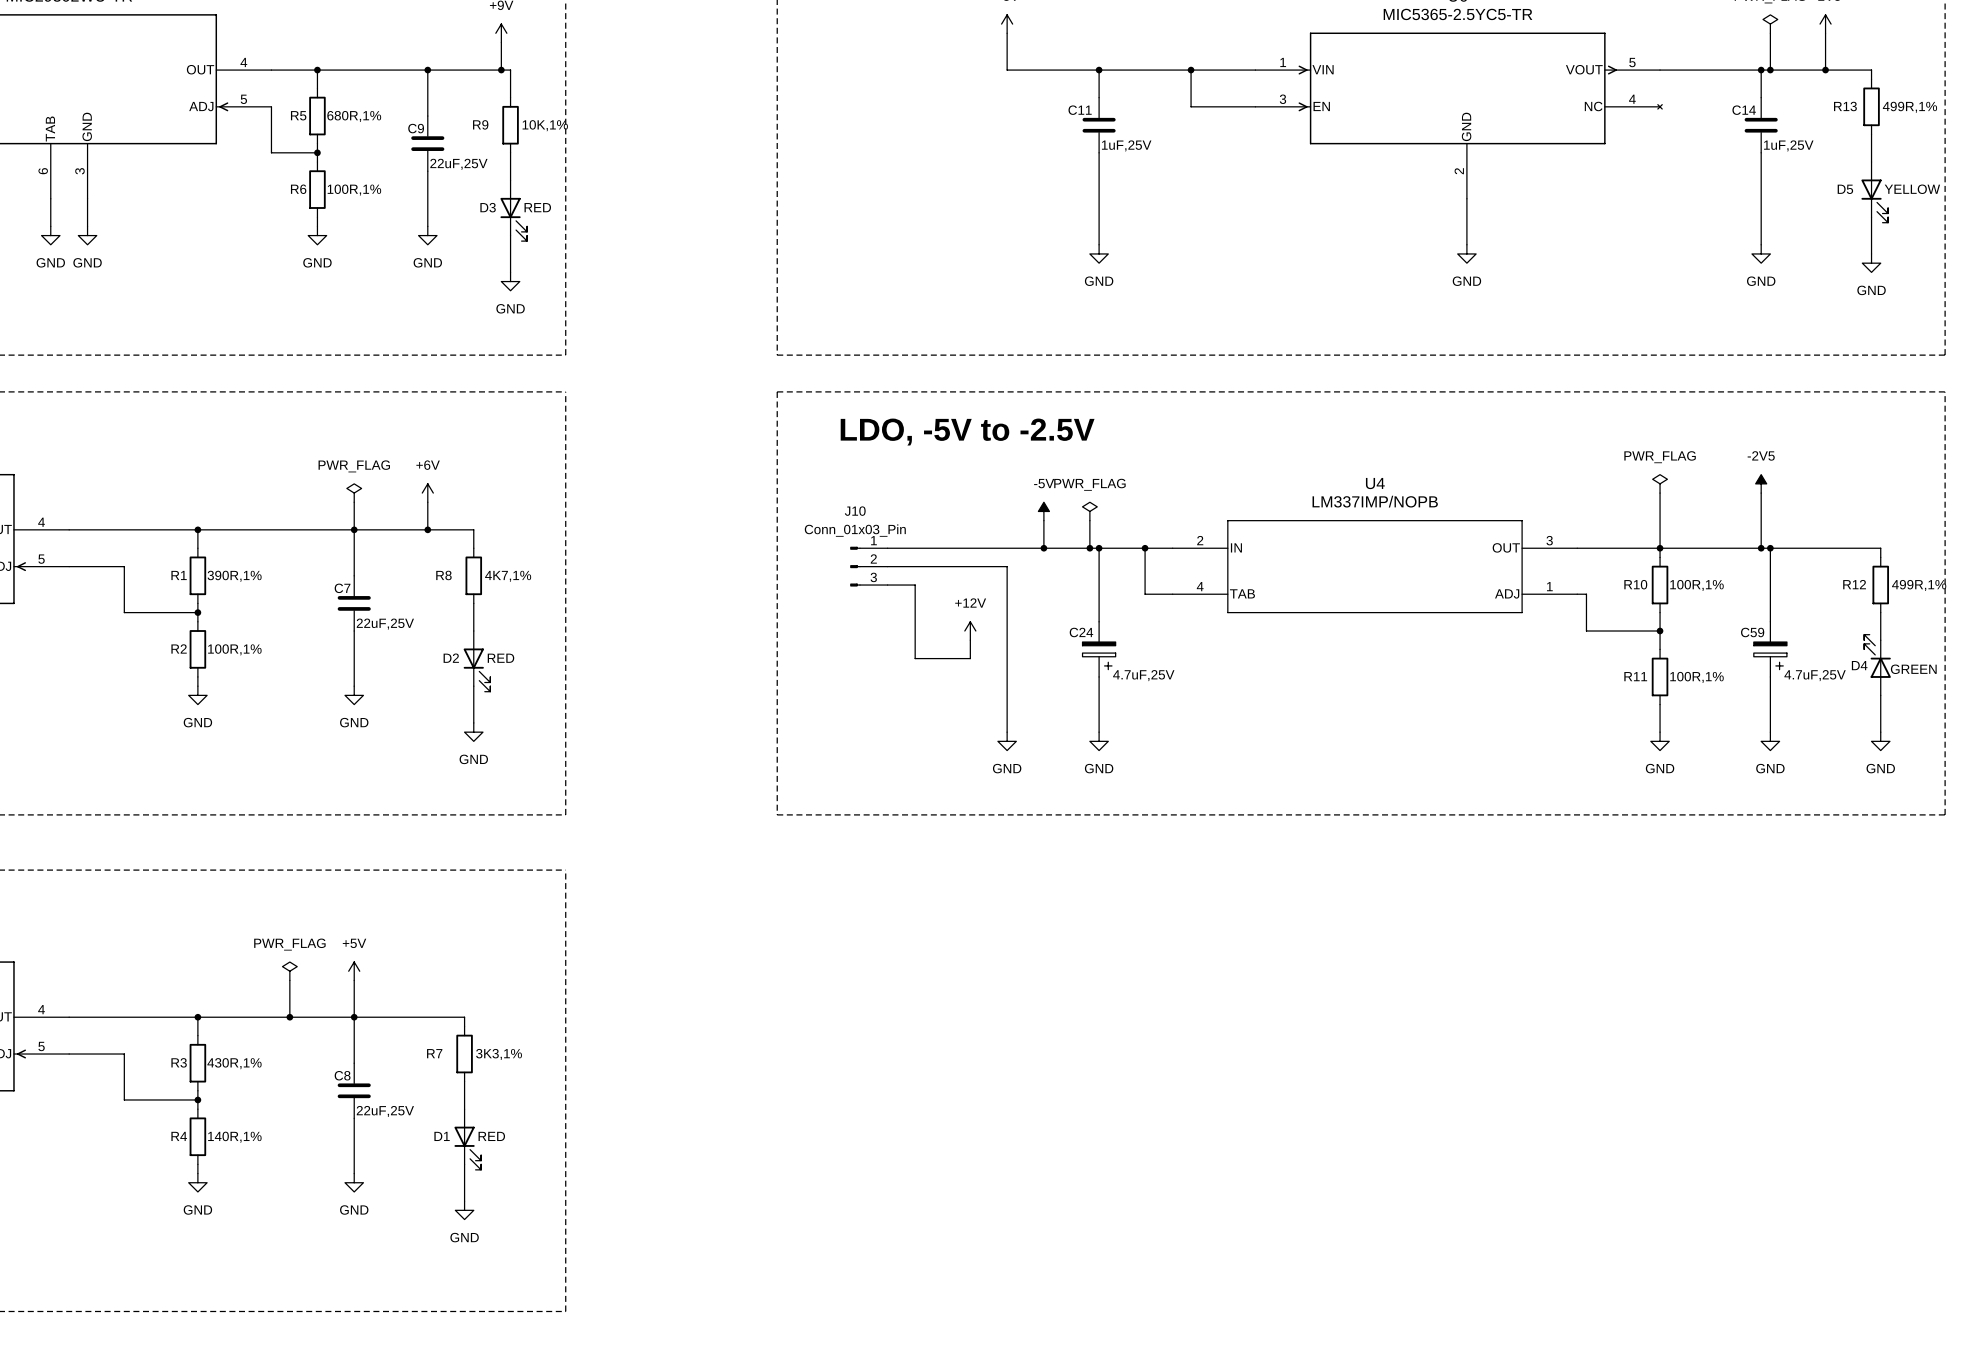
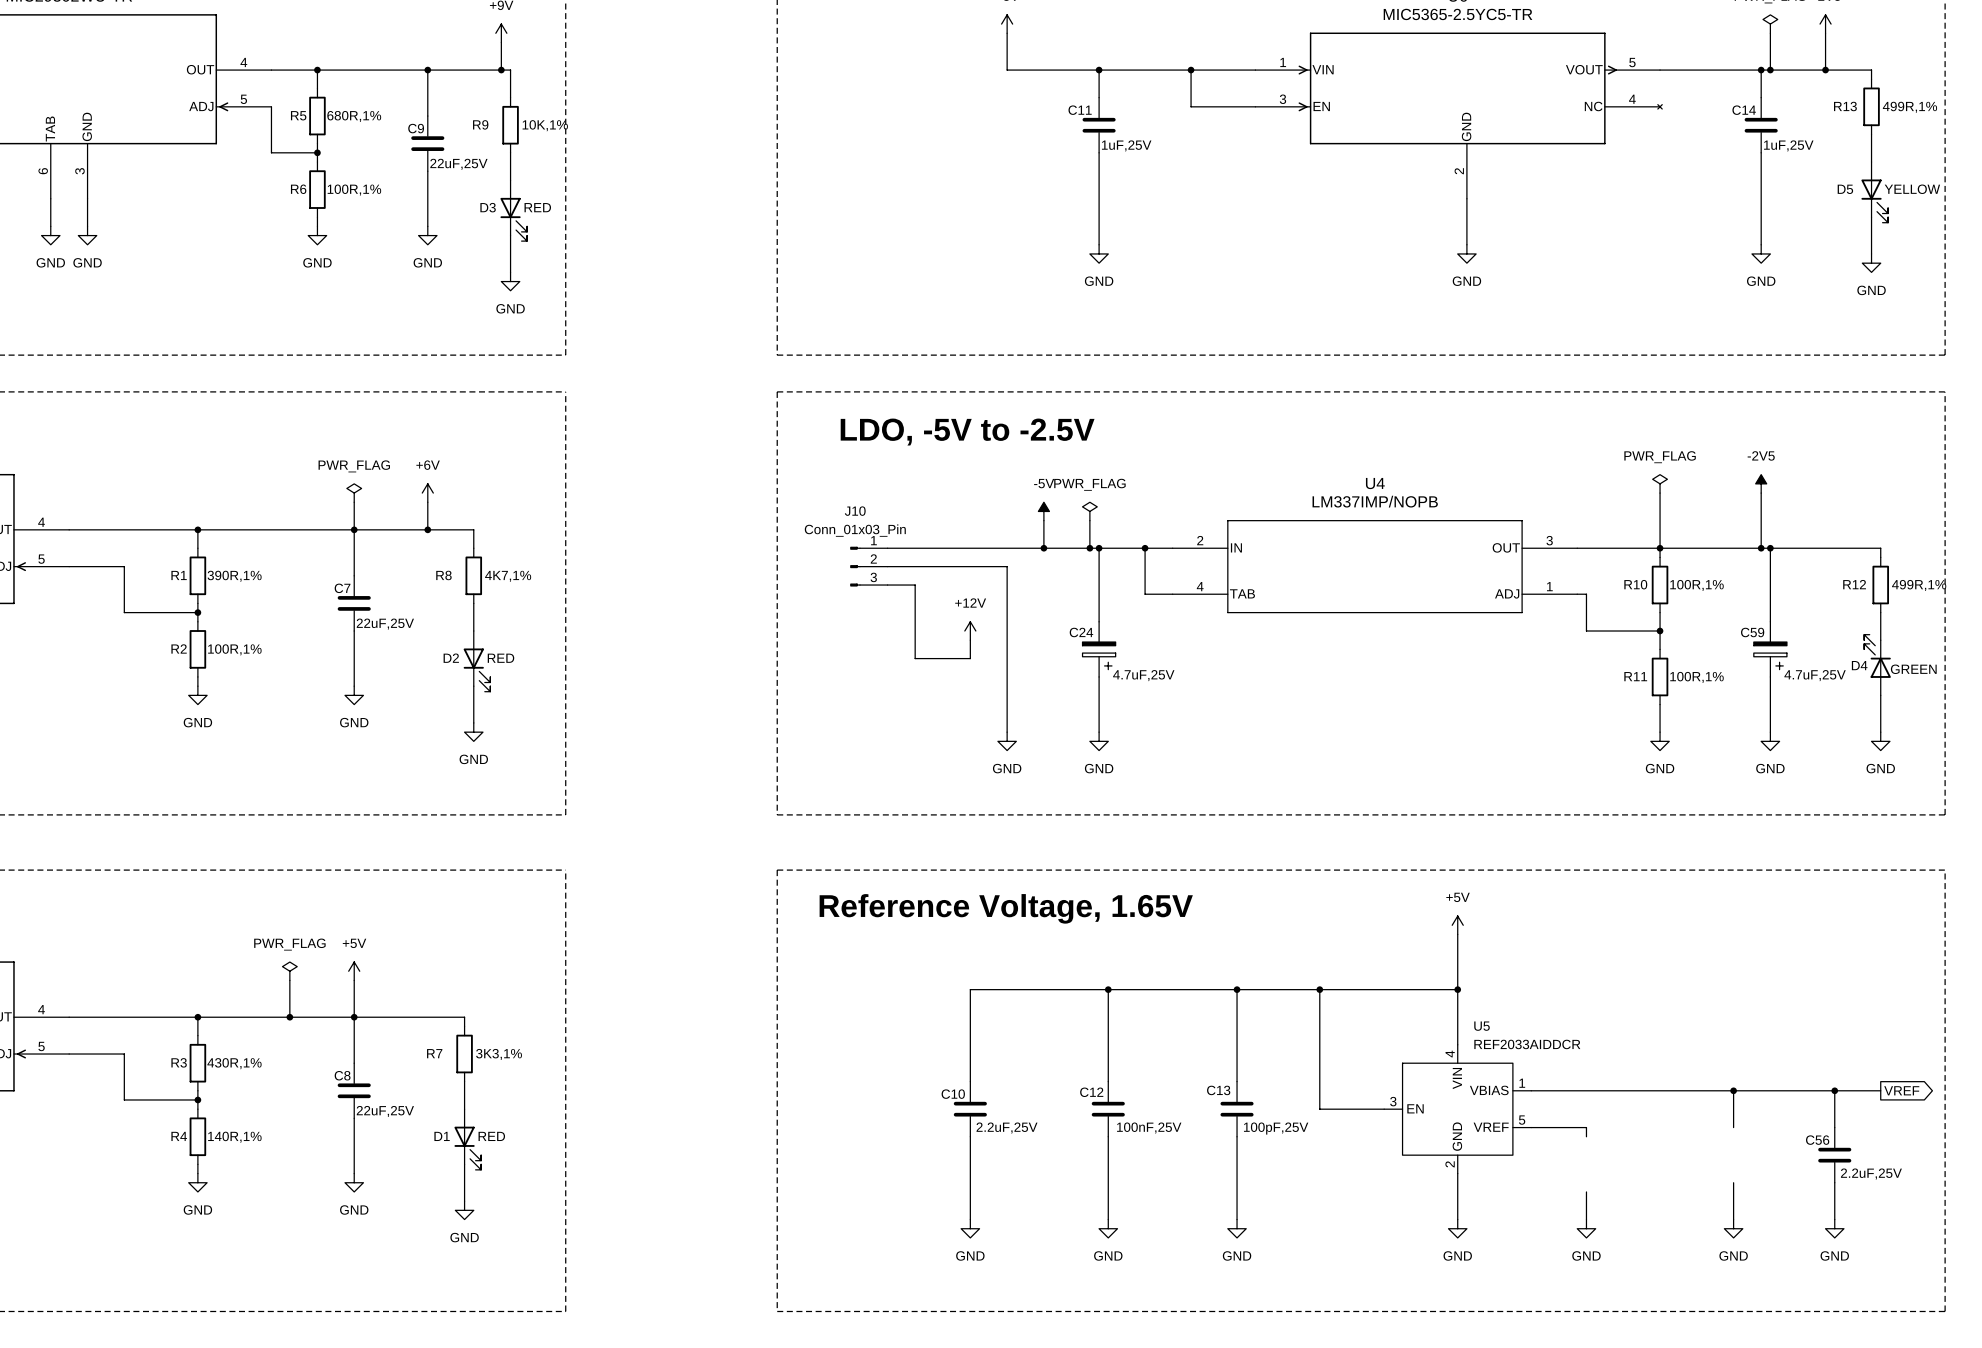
line: none -> (777, 870) (1945, 870) (1945, 1311) (777, 1311) (777, 870)
text: none -> Reference Voltage, 1.65V (1006, 908)
power symbol: none -> +5V (1457, 925)
wire: none -> (1457, 934) (1457, 1044)
wire: none -> (1108, 989) (1108, 1081)
junction: none -> (1108, 989)
wire: none -> (1237, 989) (1237, 1081)
junction: none -> (1237, 989)
wire: none -> (1319, 989) (1319, 1109) (1384, 1109)
junction: none -> (1319, 989)
wire: none -> (1457, 989) (970, 989) (970, 1081)
junction: none -> (1457, 989)
wire: none -> (1531, 1090) (1880, 1090)
wire: none -> (1733, 1090) (1733, 1127)
junction: none -> (1733, 1090)
wire: none -> (1834, 1090) (1834, 1127)
junction: none -> (1834, 1090)
global label: none -> VREF (1901, 1090)
C10: none -> 2.2uF,25V (970, 1109)
C12: none -> 100nF,25V (1108, 1109)
C13: none -> 100pF,25V (1237, 1109)
U5: none -> REF2033AIDDCR (1457, 1109)
wire: none -> (1531, 1127) (1586, 1127) (1586, 1136)
wire: none -> (970, 1136) (970, 1219)
wire: none -> (1108, 1136) (1108, 1219)
wire: none -> (1237, 1136) (1237, 1219)
C56: none -> 2.2uF,25V (1834, 1155)
wire: none -> (1457, 1173) (1457, 1219)
wire: none -> (1733, 1182) (1733, 1219)
wire: none -> (1834, 1182) (1834, 1219)
wire: none -> (1586, 1191) (1586, 1219)
power symbol: none -> GND (970, 1228)
power symbol: none -> GND (1108, 1228)
power symbol: none -> GND (1237, 1228)
power symbol: none -> GND (1457, 1228)
power symbol: none -> GND (1586, 1228)
power symbol: none -> GND (1733, 1228)
power symbol: none -> GND (1834, 1228)

